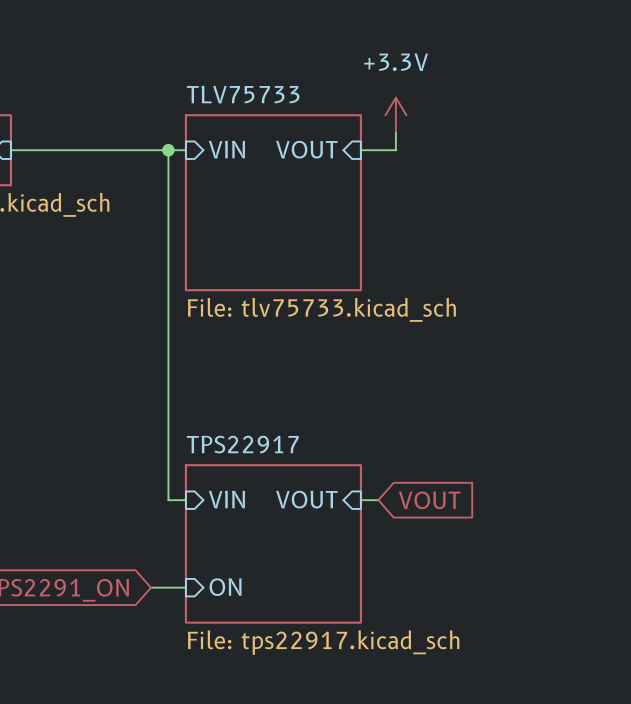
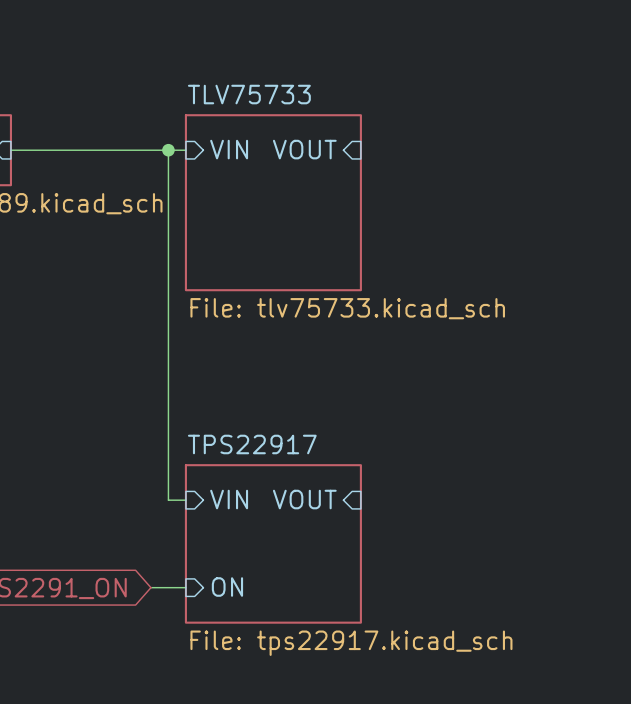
power symbol: +3.3V (395, 115) -> none
wire: (395, 132) (395, 150) (360, 150) -> none
wire: (360, 500) (378, 500) -> none
global label: VOUT (429, 500) -> none

